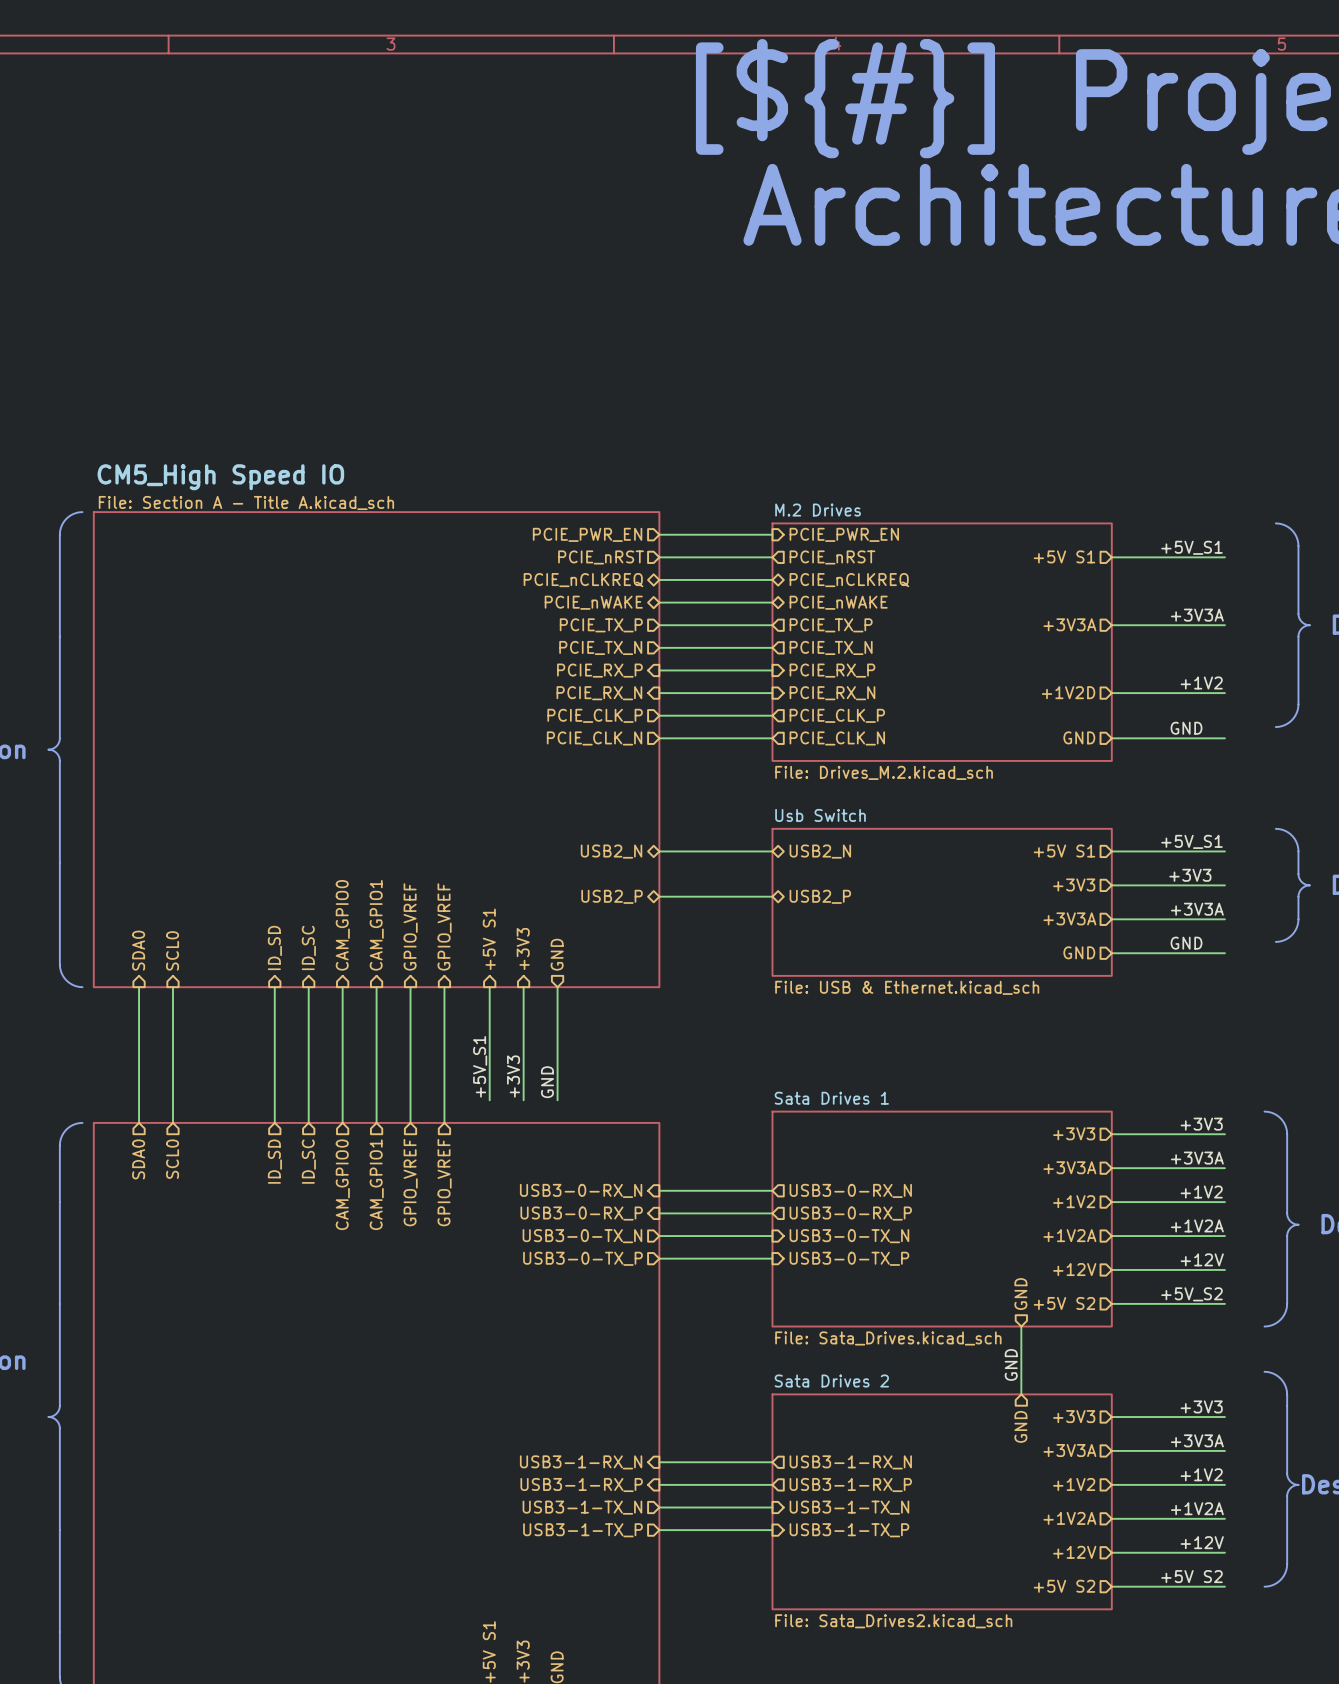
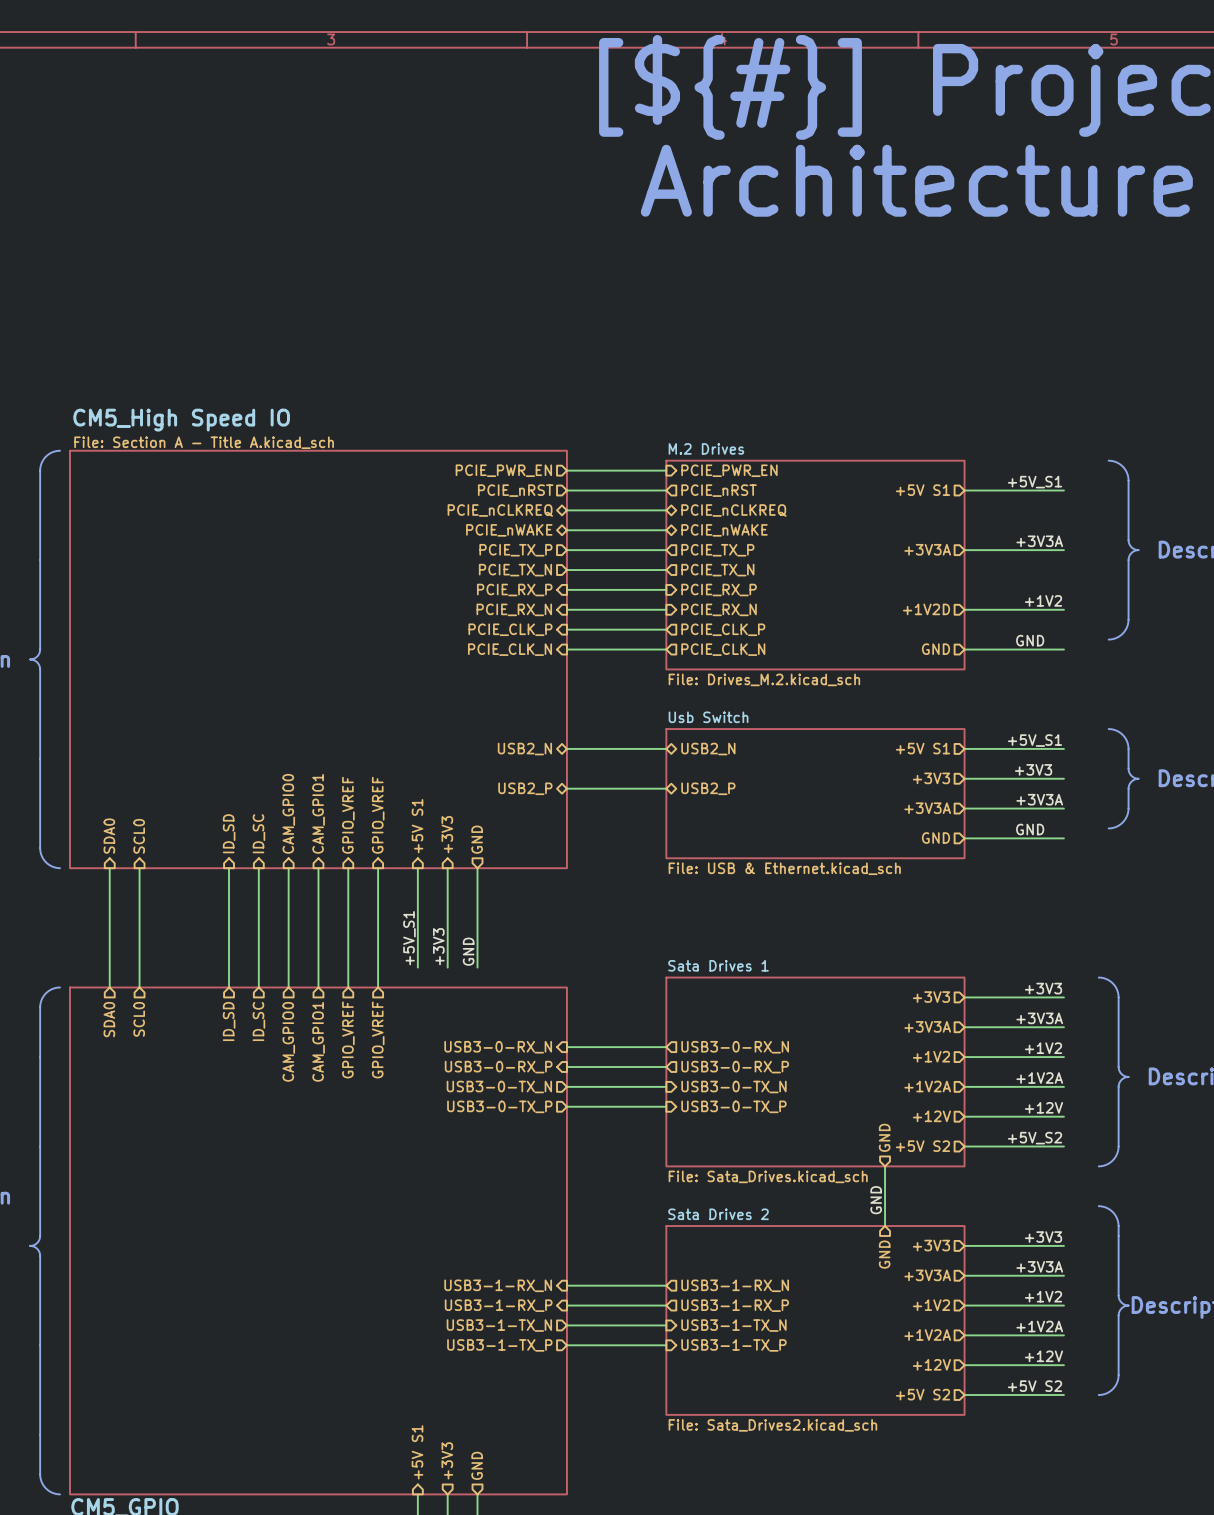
hierarchical label shape: input (595, 715) -> output (510, 629)
hierarchical label shape: input (594, 738) -> output (510, 649)

